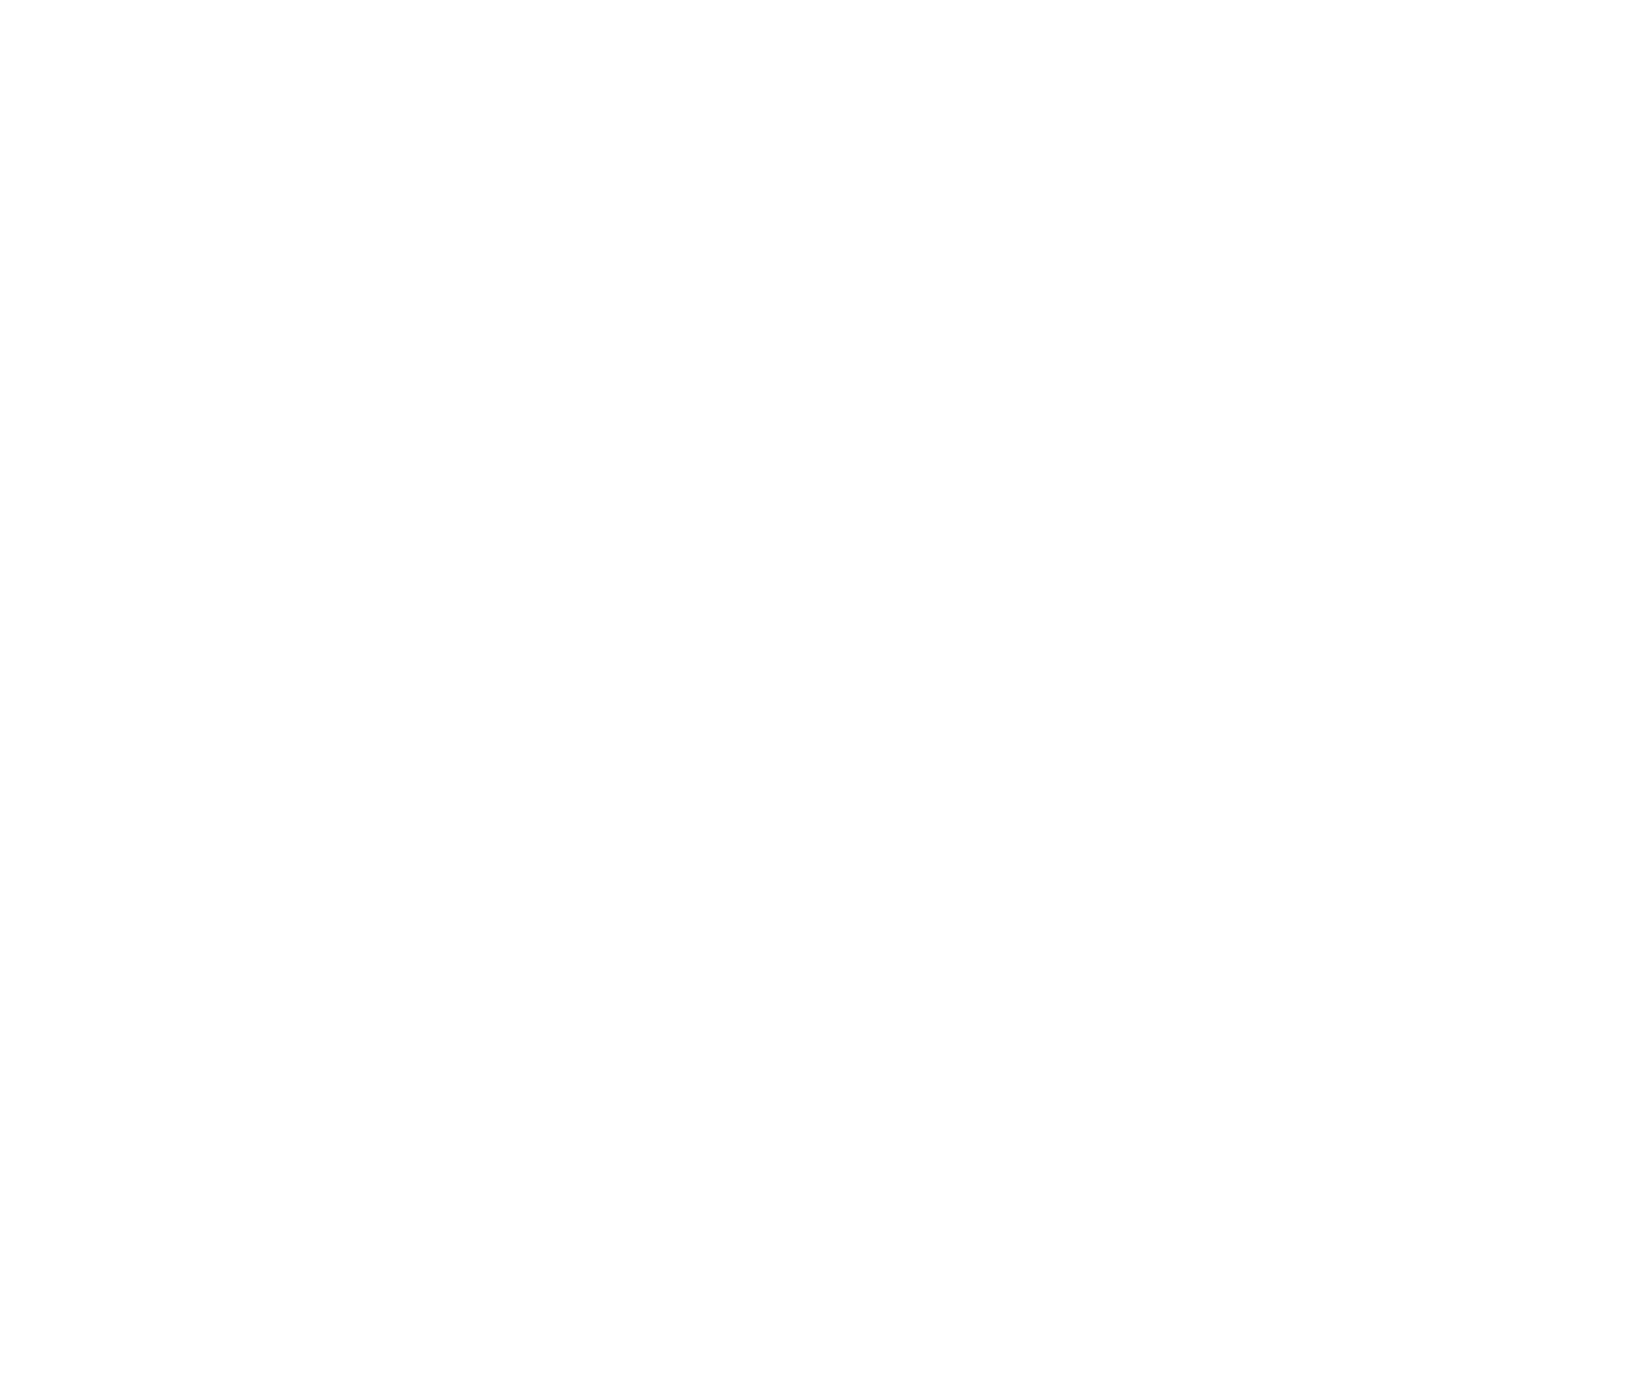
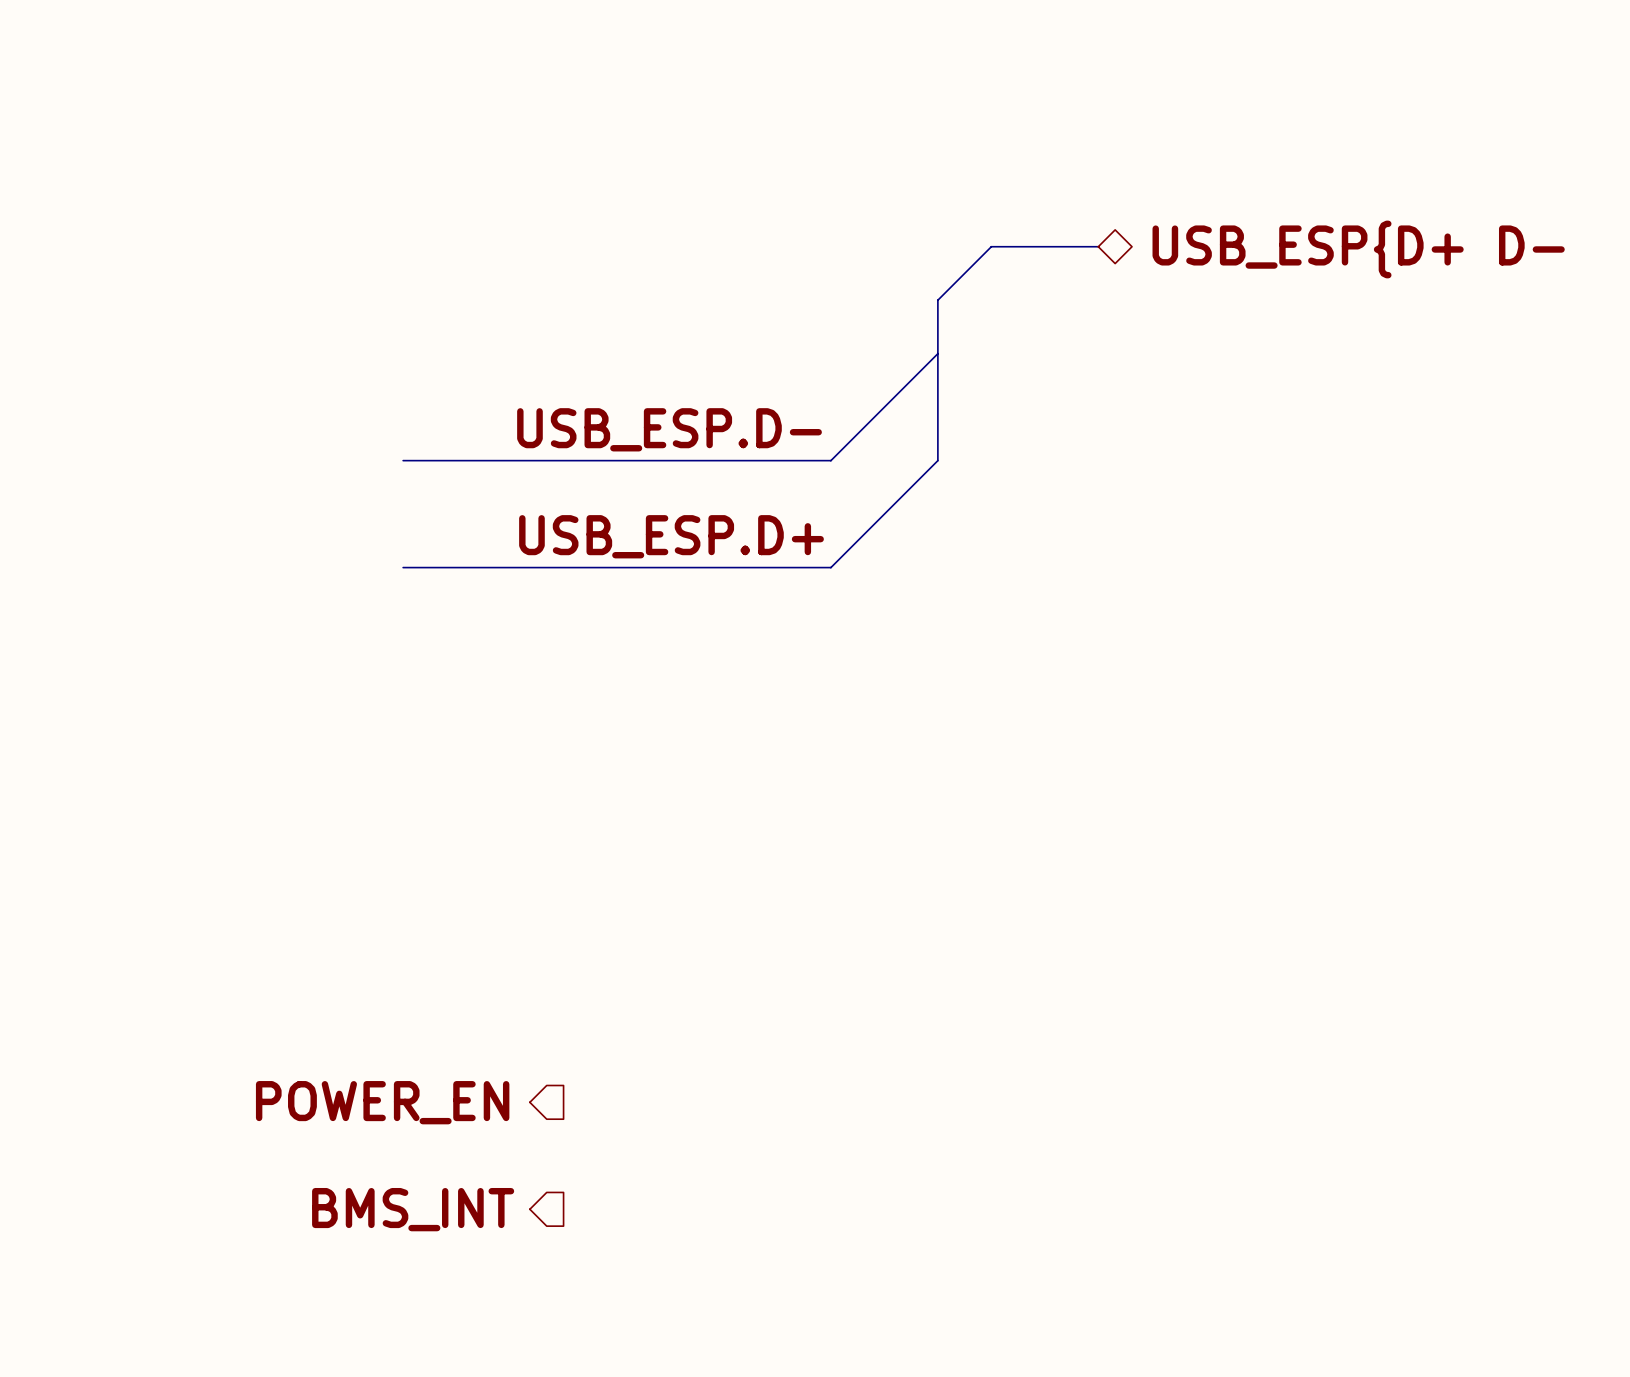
bus: none -> (1098, 246) (991, 246) (937, 300) (937, 460)
hierarchical label: none -> USB_ESP{D+ D- (1358, 249)
wire: none -> (937, 353) (830, 460) (403, 460)
label: none -> USB_ESP.D- (669, 429)
wire: none -> (937, 460) (830, 567) (403, 567)
label: none -> USB_ESP.D+ (671, 536)
hierarchical label: none -> POWER_EN (382, 1102)
hierarchical label: none -> BMS_INT (413, 1209)

